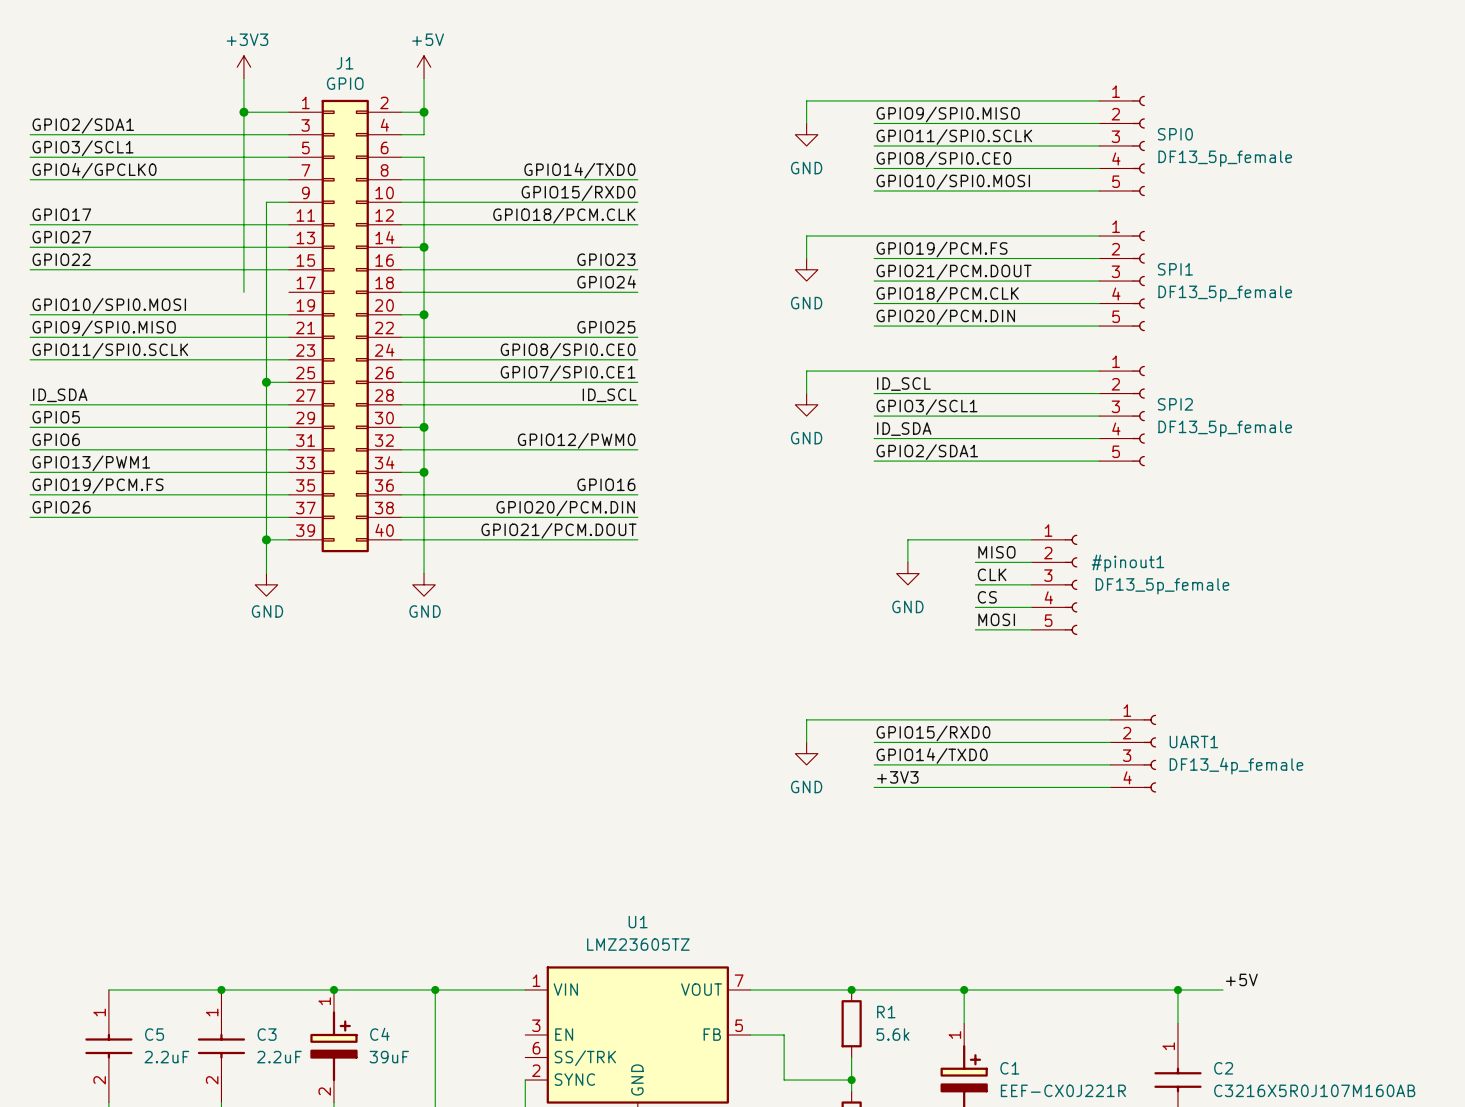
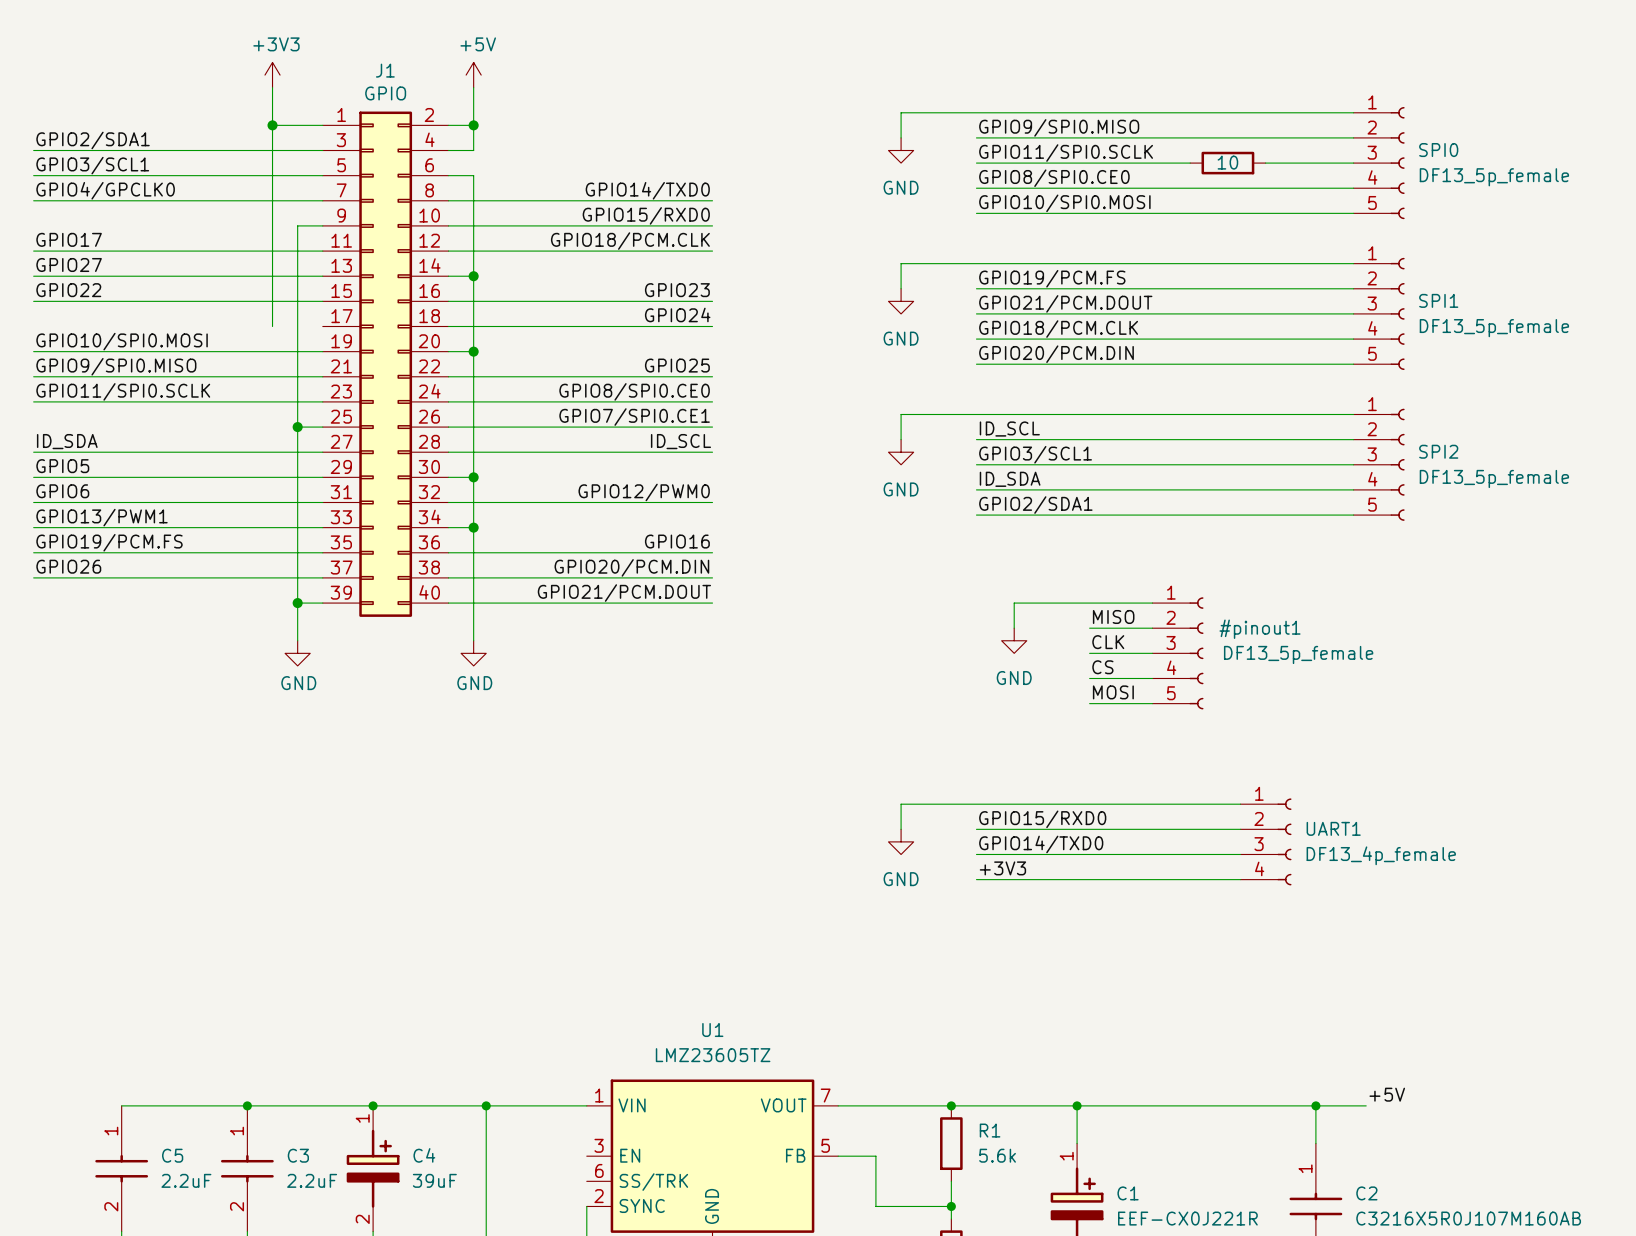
wire: none -> (1227, 112) (1353, 112)
wire: none -> (1227, 137) (1353, 137)
wire: (1065, 145) (1099, 145) -> none
part: none -> 10 (1227, 163)
SPI0 position: (1122, 145) -> (1379, 163)
wire: none -> (1265, 163) (1353, 163)
wire: none -> (1227, 188) (1353, 188)
wire: none -> (1227, 213) (1353, 213)
wire: none -> (1227, 263) (1353, 263)
wire: none -> (1227, 288) (1353, 288)
wire: none -> (1227, 313) (1353, 313)
SPI1 position: (1122, 281) -> (1379, 313)
wire: none -> (1227, 339) (1353, 339)
wire: none -> (1227, 364) (1353, 364)
wire: none -> (1227, 414) (1353, 414)
wire: none -> (1227, 439) (1353, 439)
wire: none -> (1227, 464) (1353, 464)
SPI2 position: (1122, 416) -> (1379, 464)
wire: none -> (1227, 489) (1353, 489)
wire: none -> (1227, 515) (1353, 515)

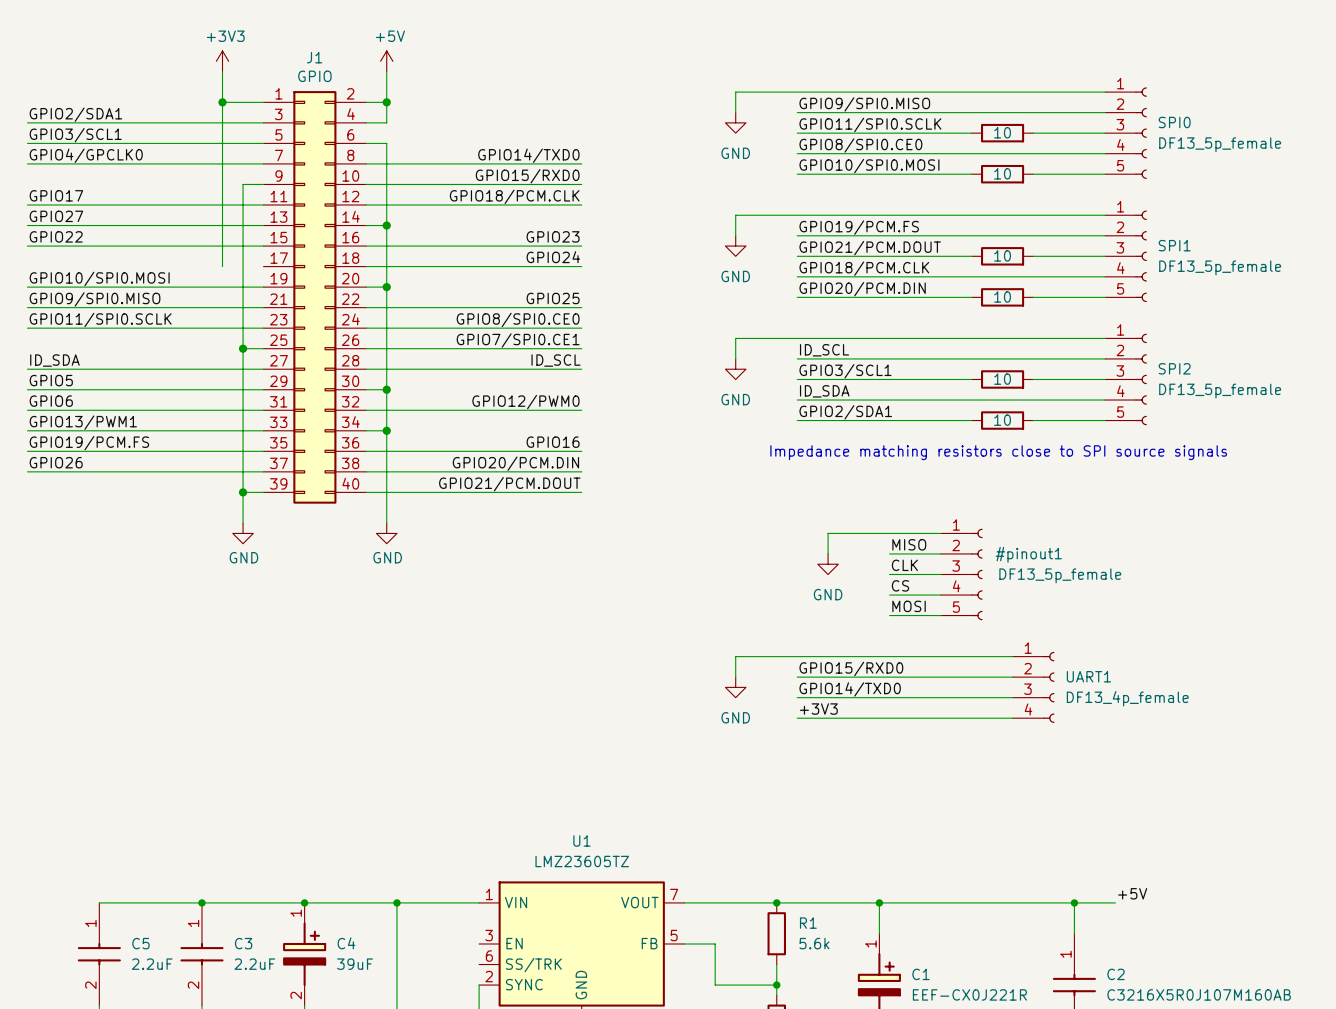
wire: (1190, 213) (1265, 213) -> none
part: none -> 10 (1002, 174)
wire: (1190, 313) (1265, 313) -> none
part: none -> 10 (1002, 256)
wire: (1190, 364) (1265, 364) -> none
part: none -> 10 (1002, 297)
wire: (1190, 464) (1265, 464) -> none
part: none -> 10 (1002, 379)
wire: (1190, 515) (1265, 515) -> none
part: none -> 10 (1002, 420)
text: none -> Impedance matching resistors close to SPI source signals (998, 452)
wire: (1152, 603) (1014, 603) (1014, 628) -> none
label: MISO (1113, 616) -> none
wire: (1089, 628) (1152, 628) -> (889, 595) (940, 595)
power symbol position: GND (1014, 640) -> GND (828, 564)
label: CLK (1108, 642) -> none
wire: none -> (889, 533) (828, 533) (828, 553)
#pinout1 position: DF13_5p_female (1178, 653) -> DF13_5p_female (961, 574)
label: CS (1102, 667) -> MISO (909, 544)
label: MOSI (1113, 692) -> CLK (904, 565)
label: none -> CS (900, 585)
label: none -> MOSI (909, 606)
wire: none -> (889, 615) (940, 615)

